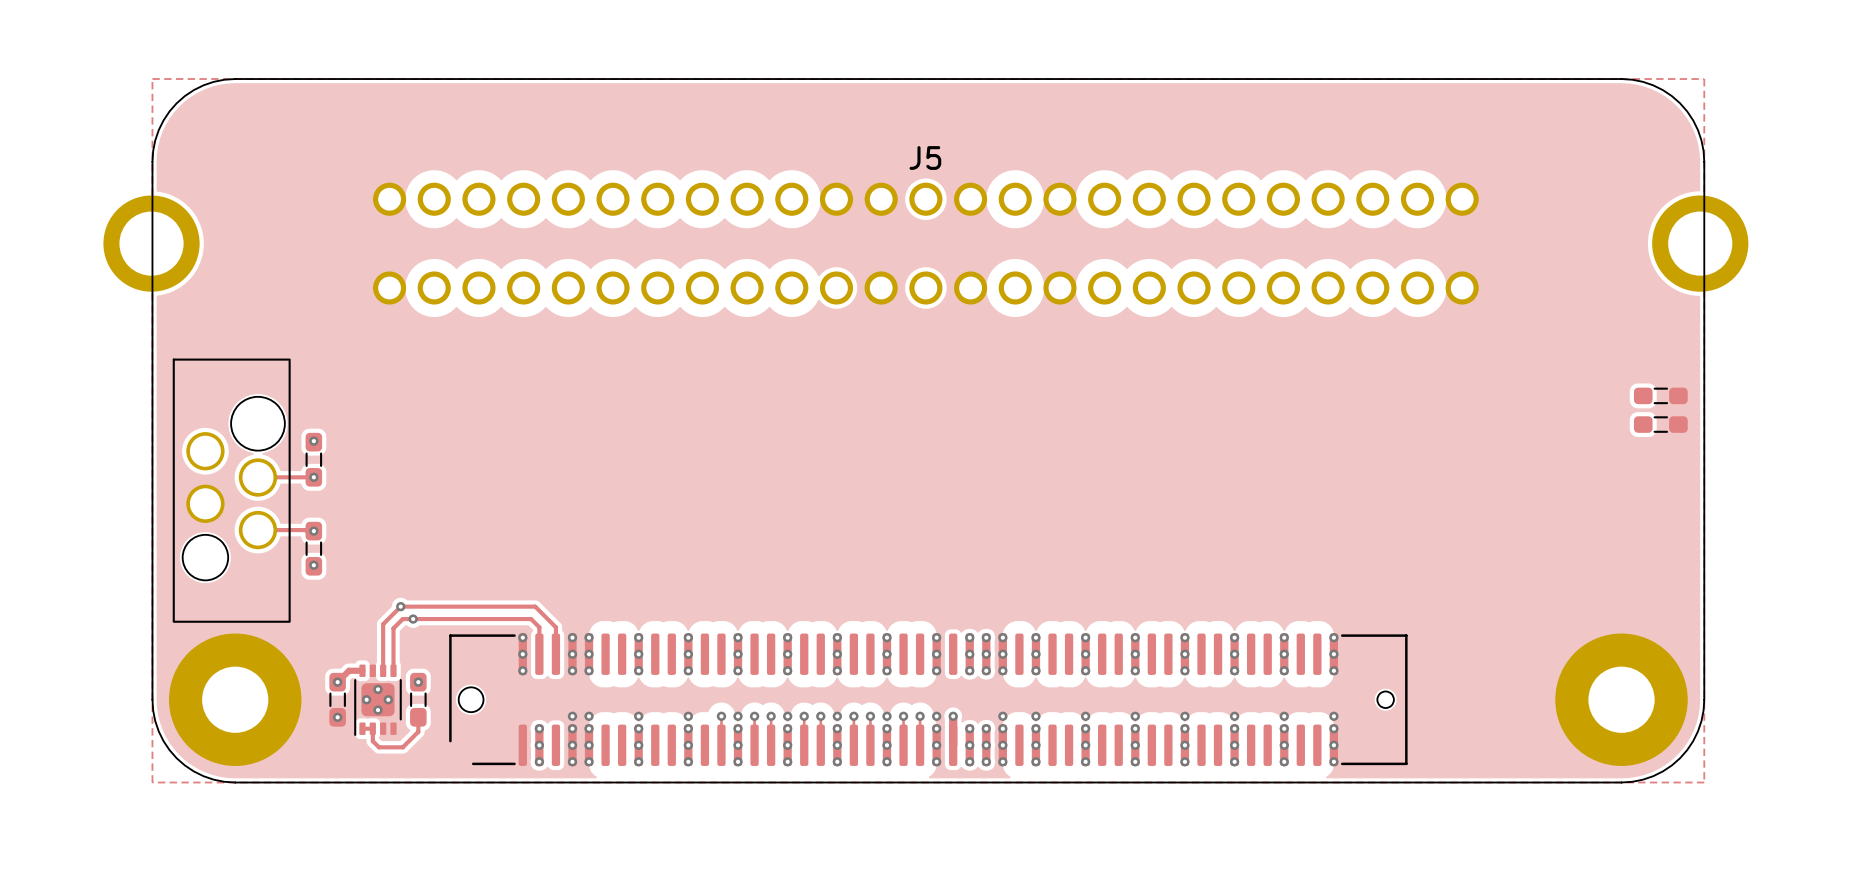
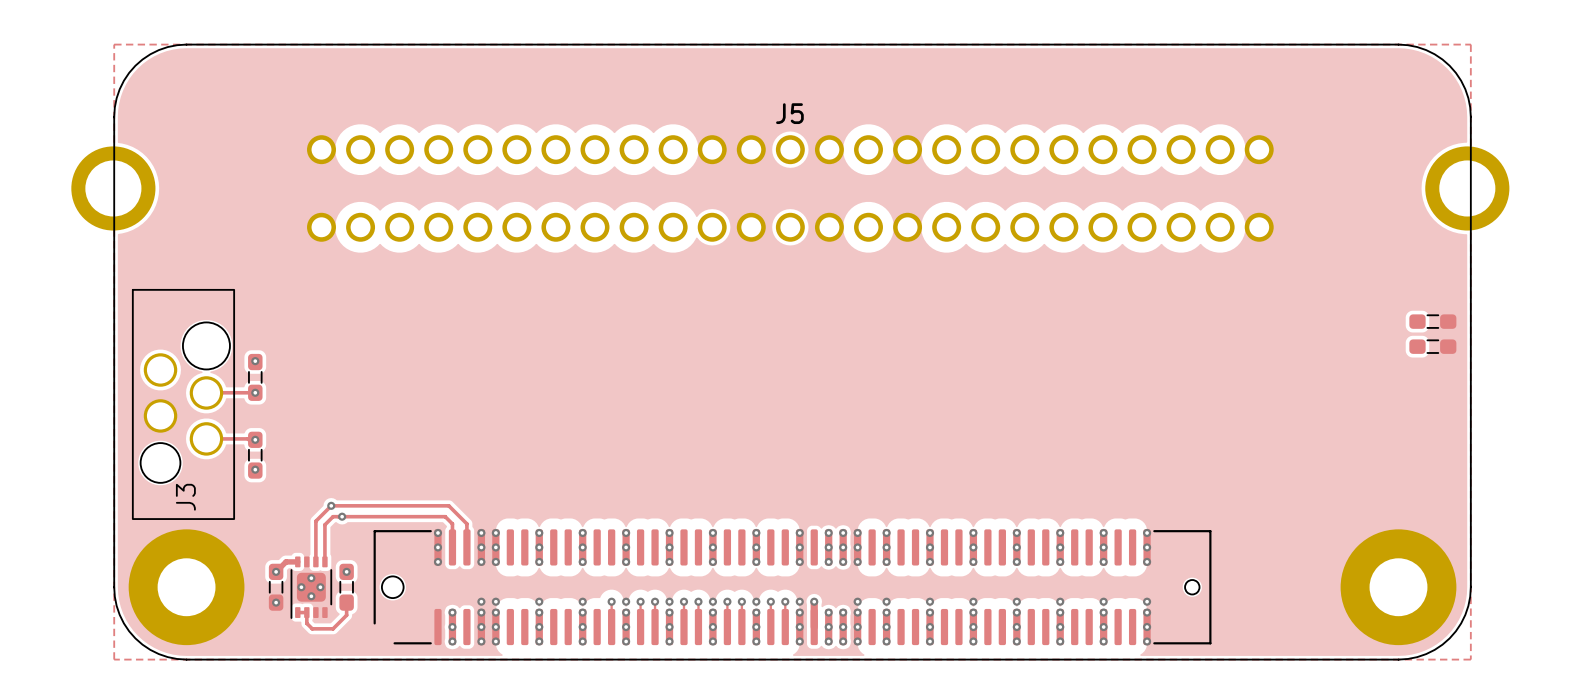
J3 name: none -> J3 (185, 497)

